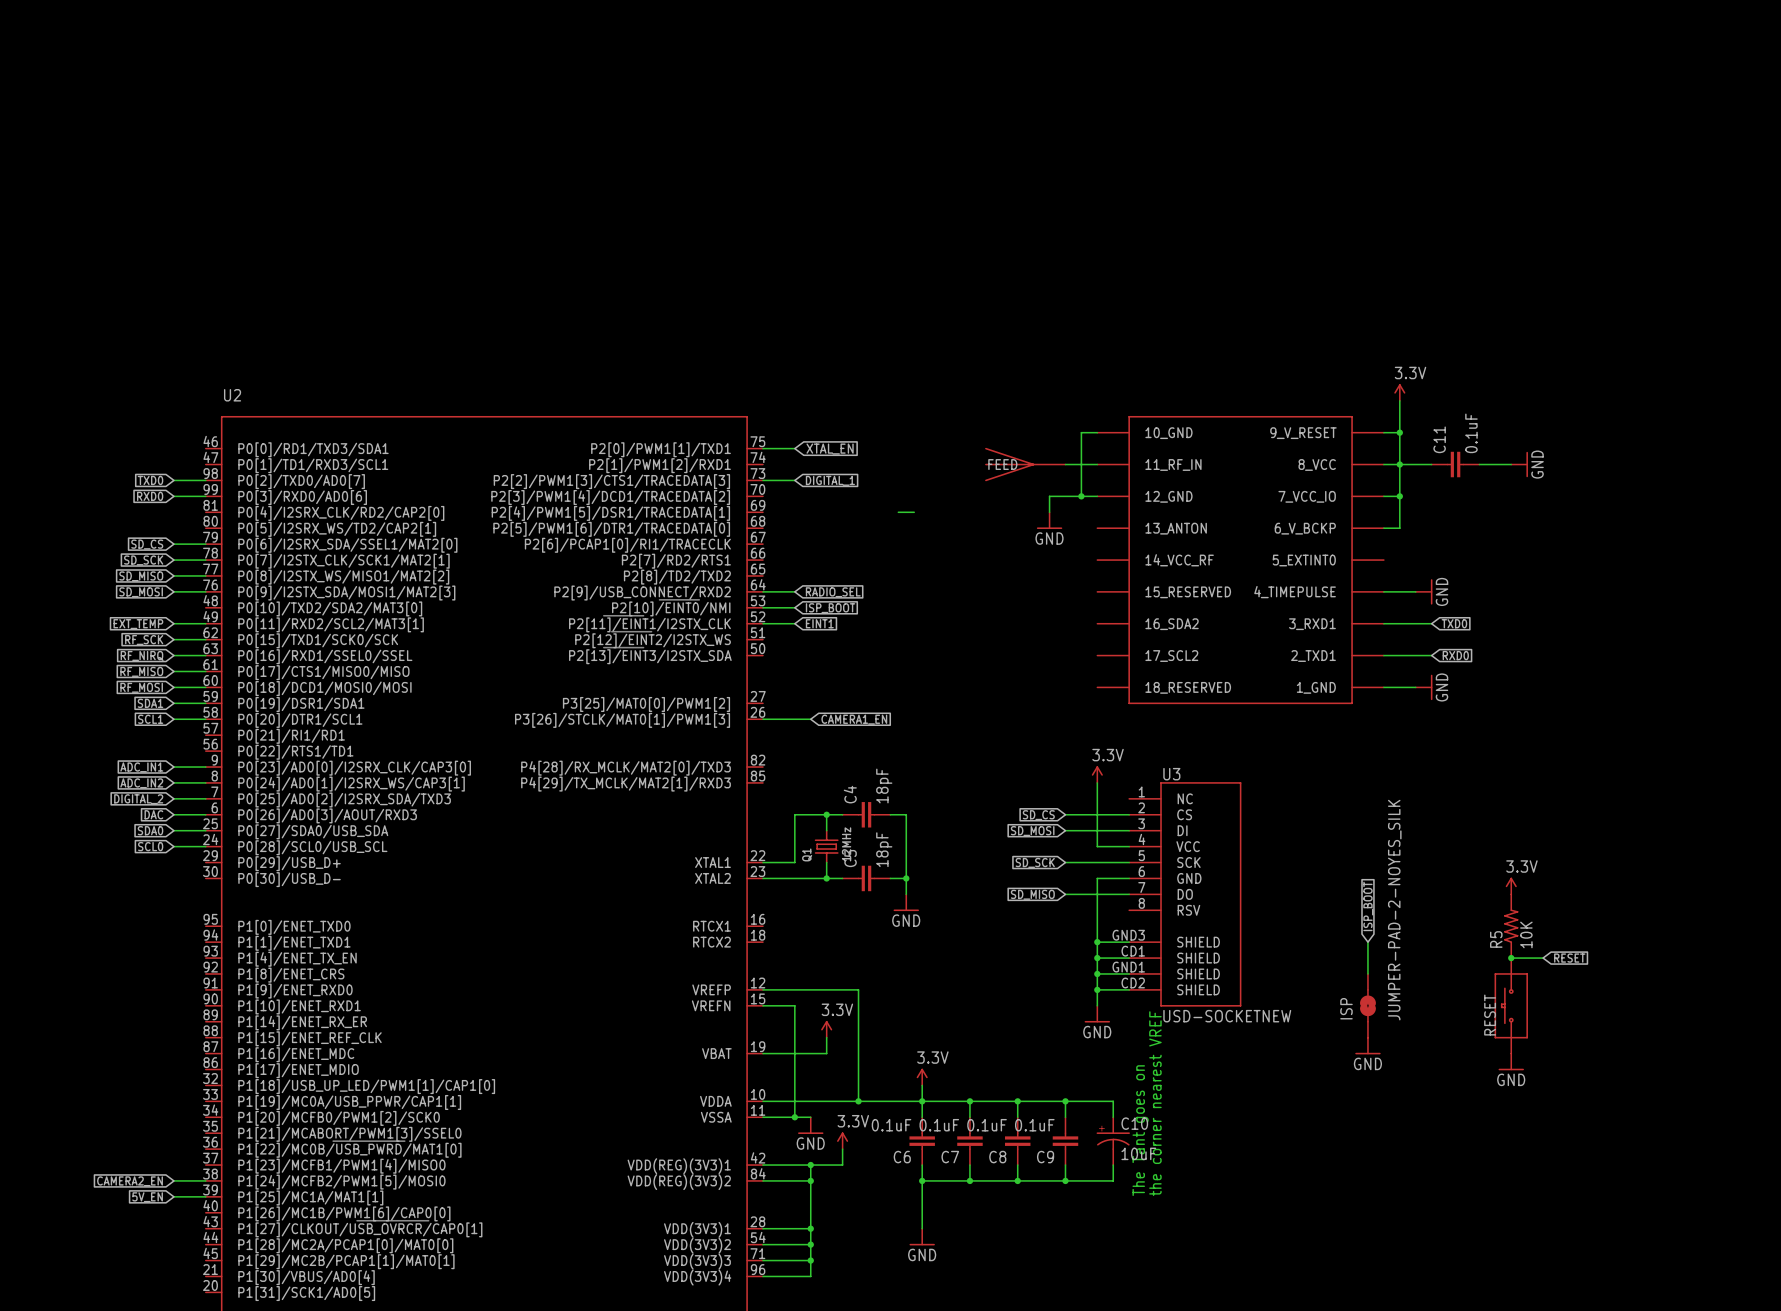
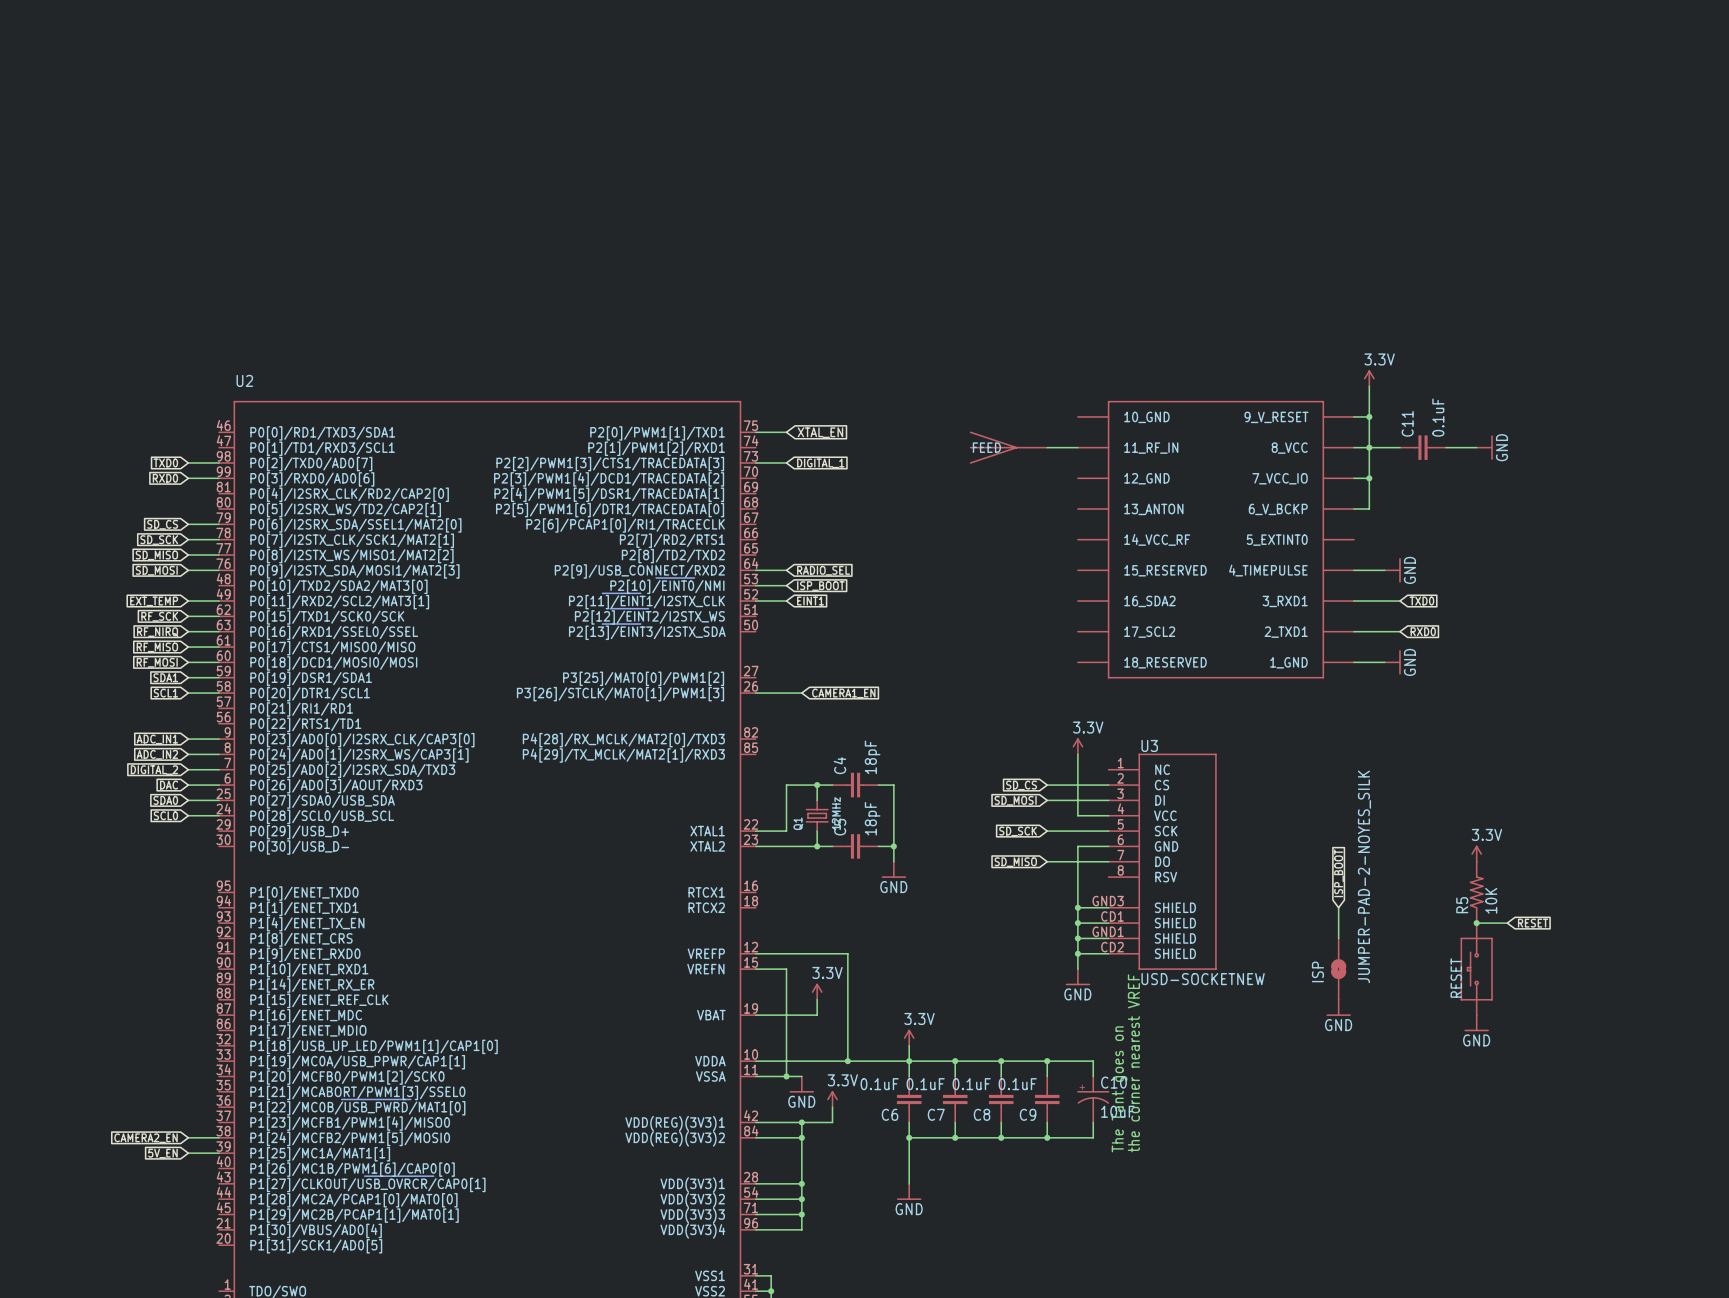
wire: (1097, 432) (1081, 432) (1081, 496) -> none
junction: (1081, 496) -> none
wire: (1097, 496) (1049, 496) (1049, 512) -> none
wire: (898, 512) (914, 512) -> none
power symbol: GND (1049, 520) -> none

